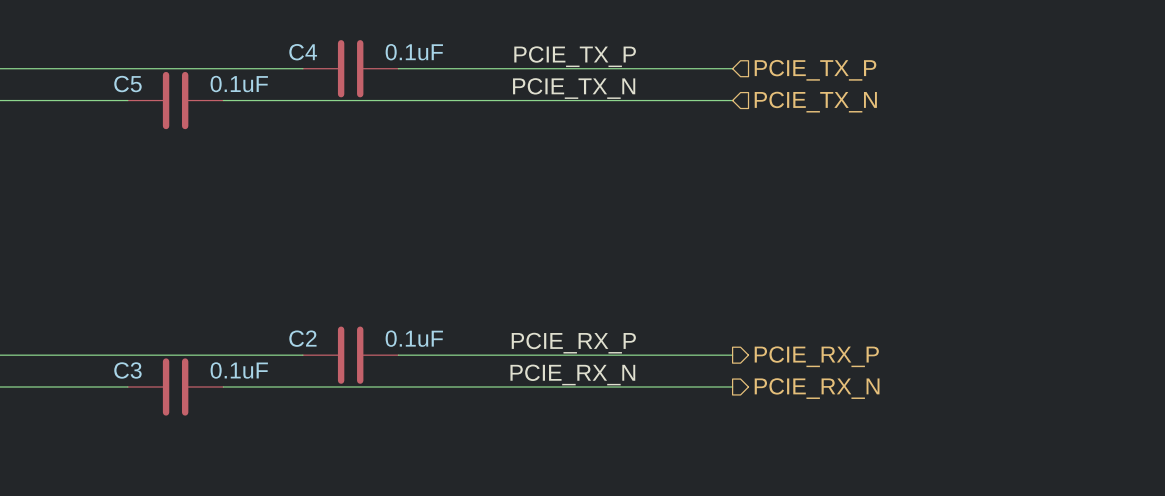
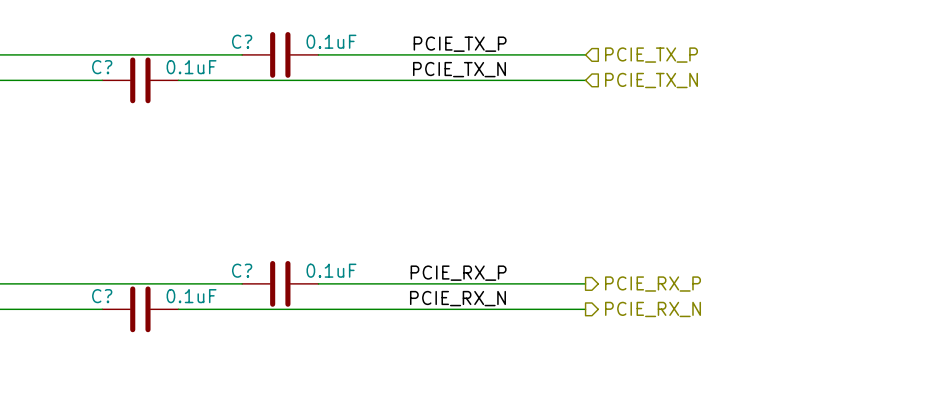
C4 name: C4 (303, 52) -> C? (242, 41)
C5 name: C5 (127, 84) -> C? (102, 67)
C2 name: C2 (302, 338) -> C? (242, 270)
C3 name: C3 (127, 370) -> C? (102, 296)

